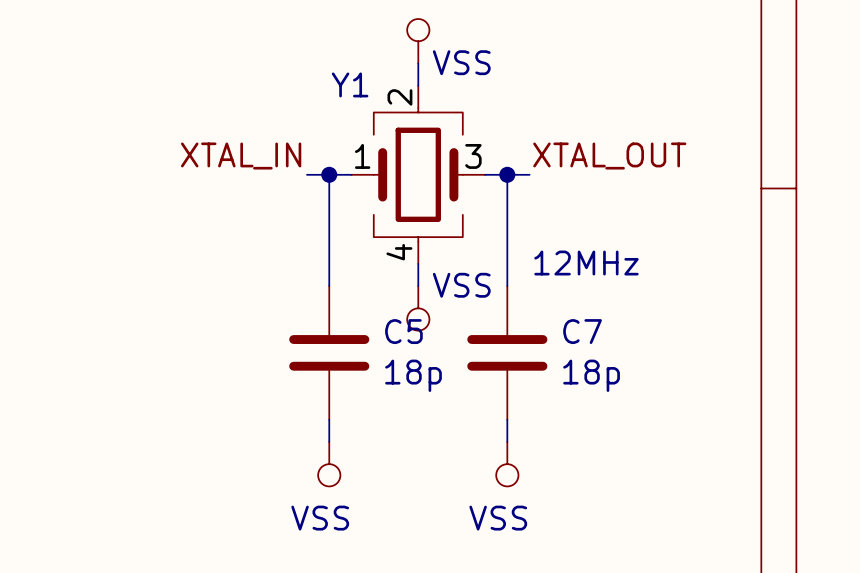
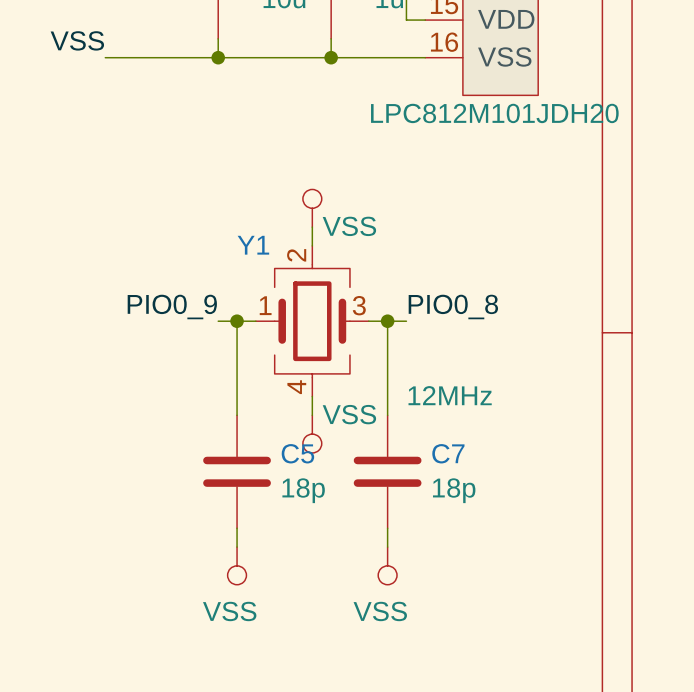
label: XTAL_IN (241, 156) -> PIO0_9 (172, 306)
label: XTAL_OUT (609, 156) -> PIO0_8 (453, 306)

